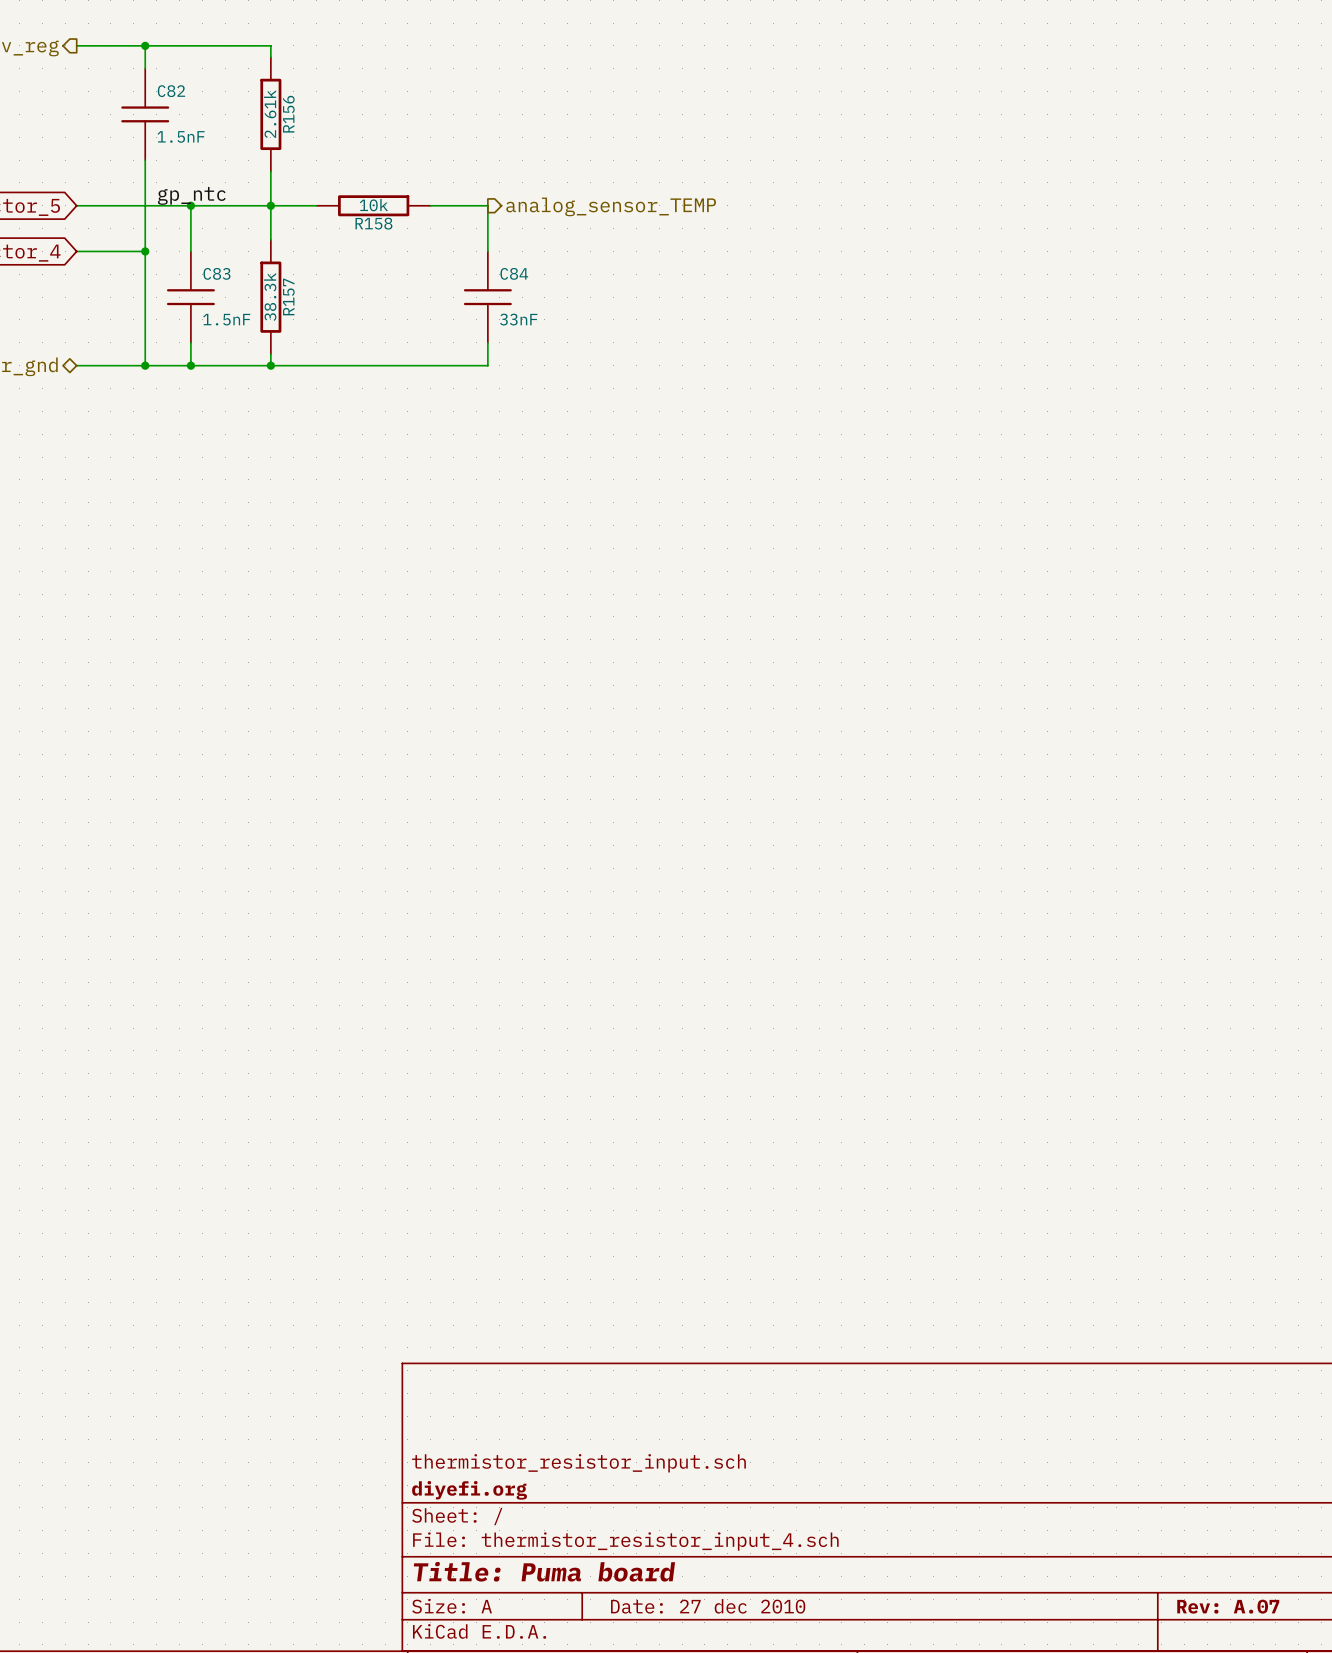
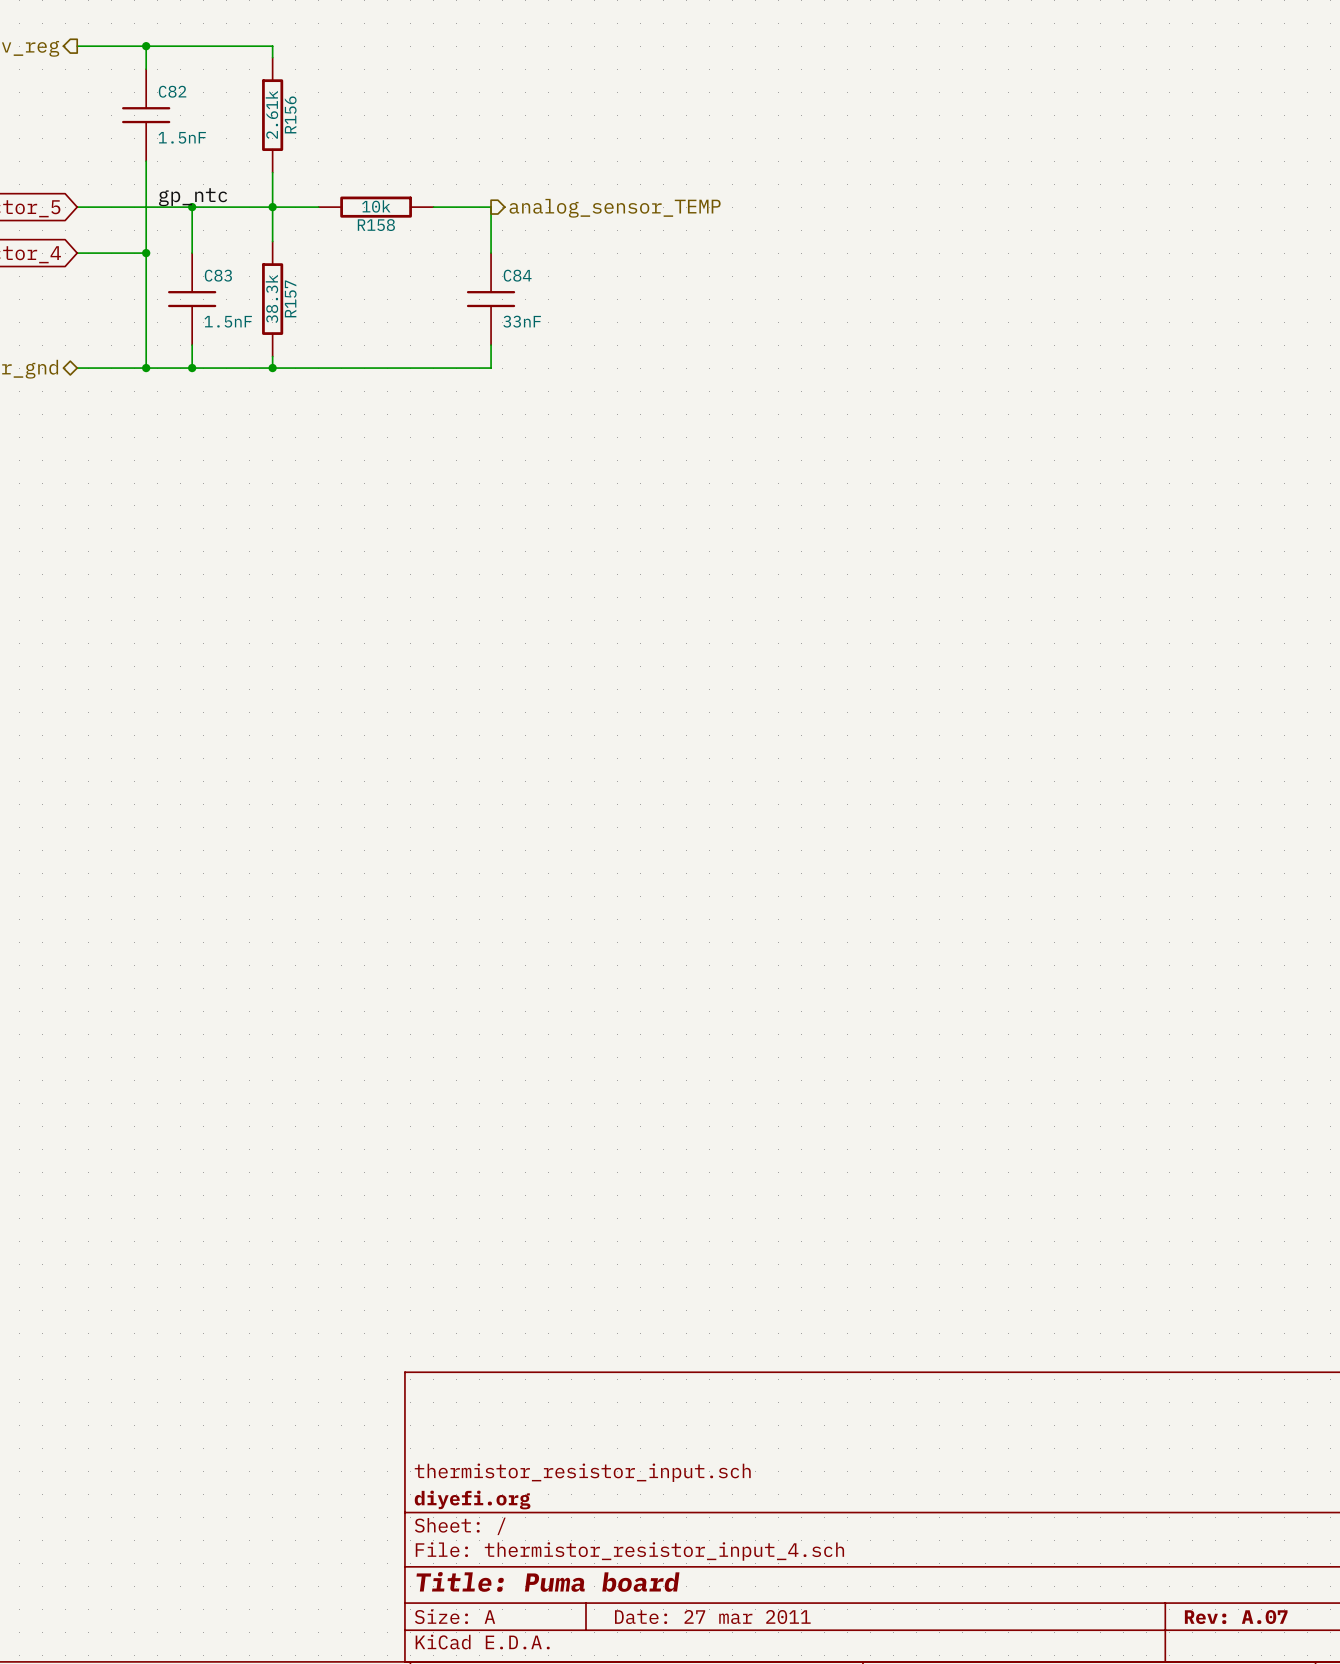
title block: Date: 27 dec 2010 (708, 1606) -> Date: 27 mar 2011 (712, 1617)

